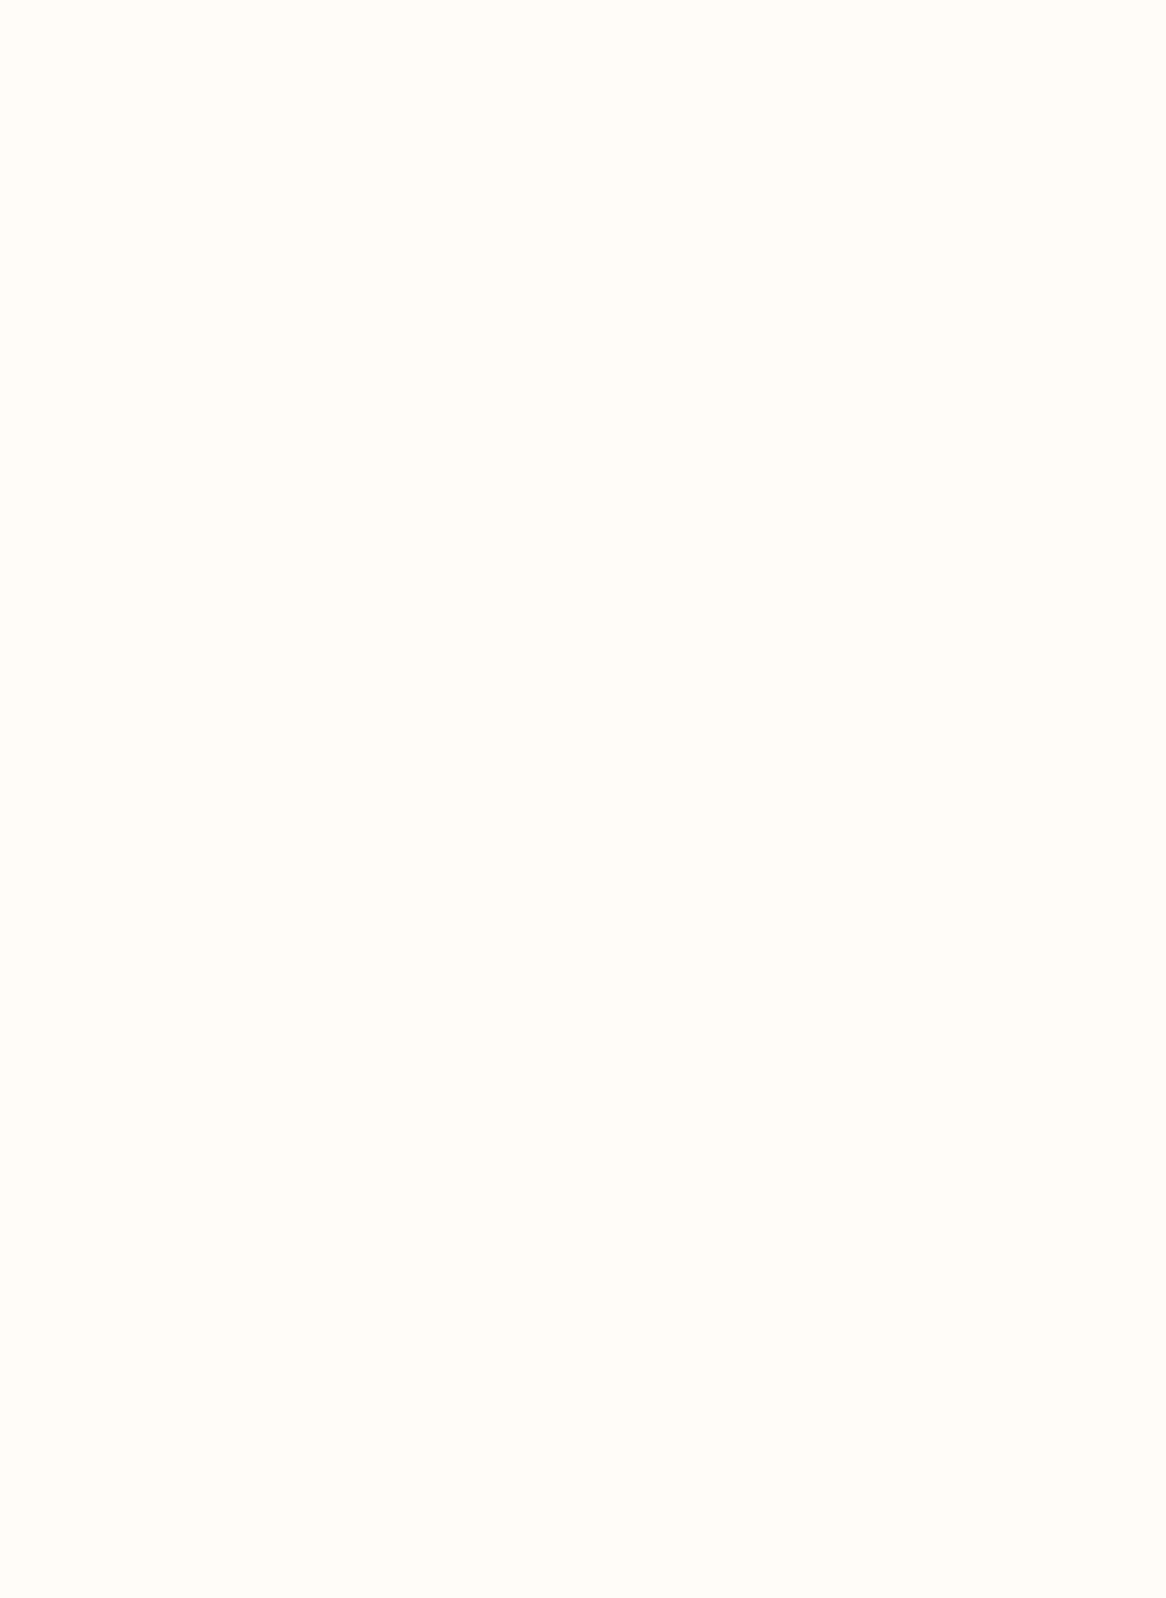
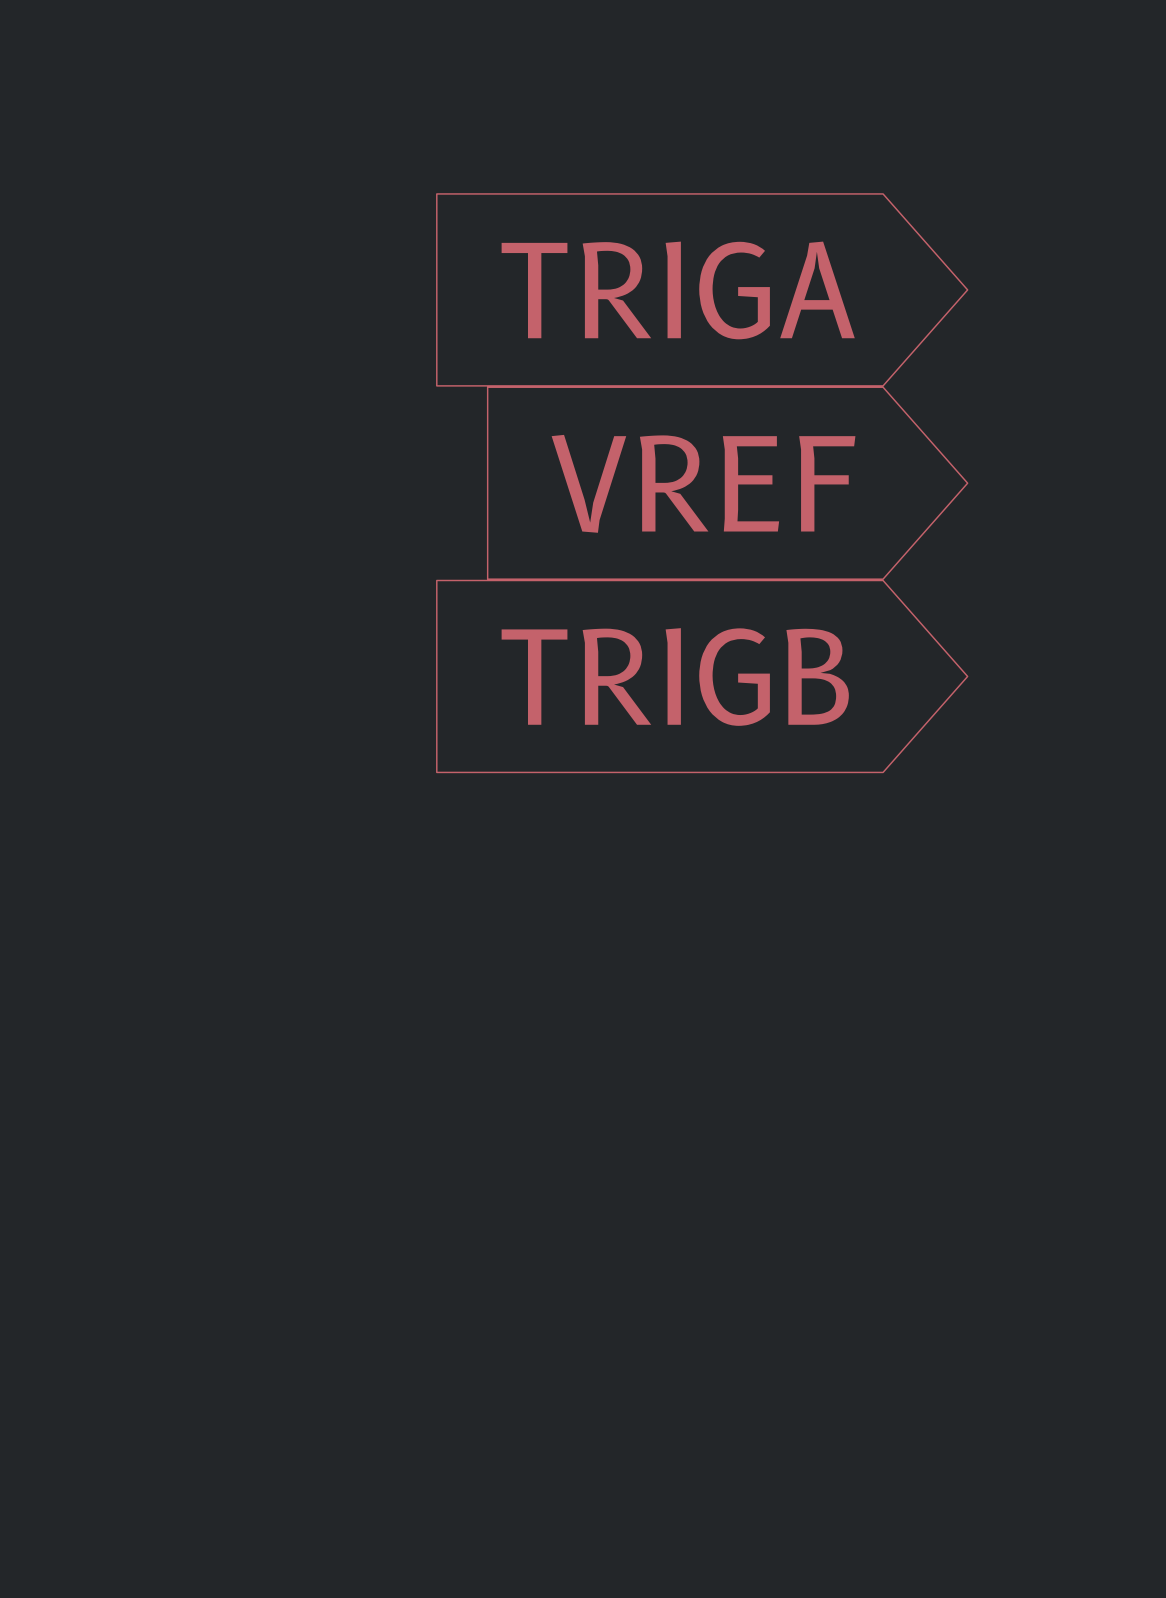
global label: none -> TRIGA (678, 290)
global label: none -> VREF (703, 483)
global label: none -> TRIGB (675, 677)

